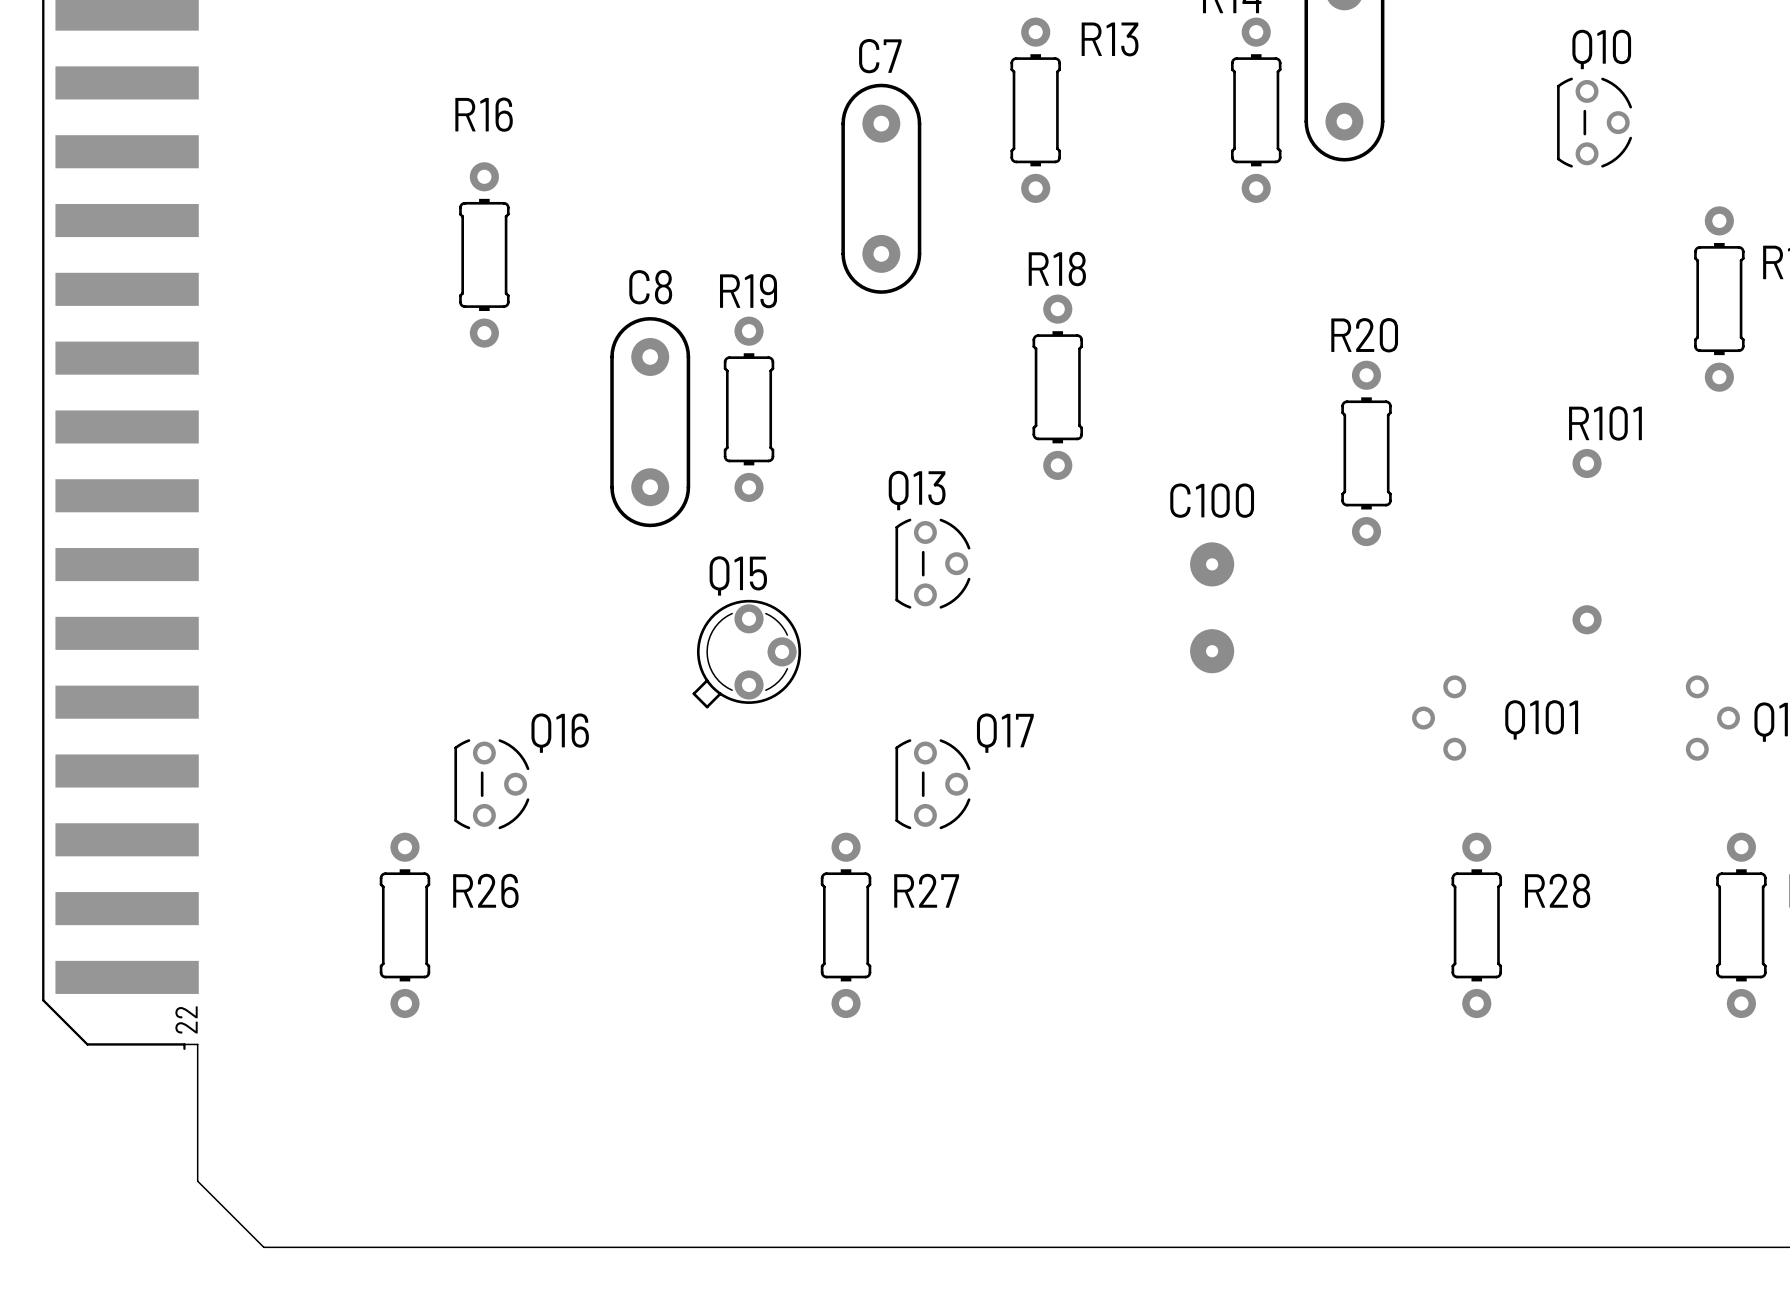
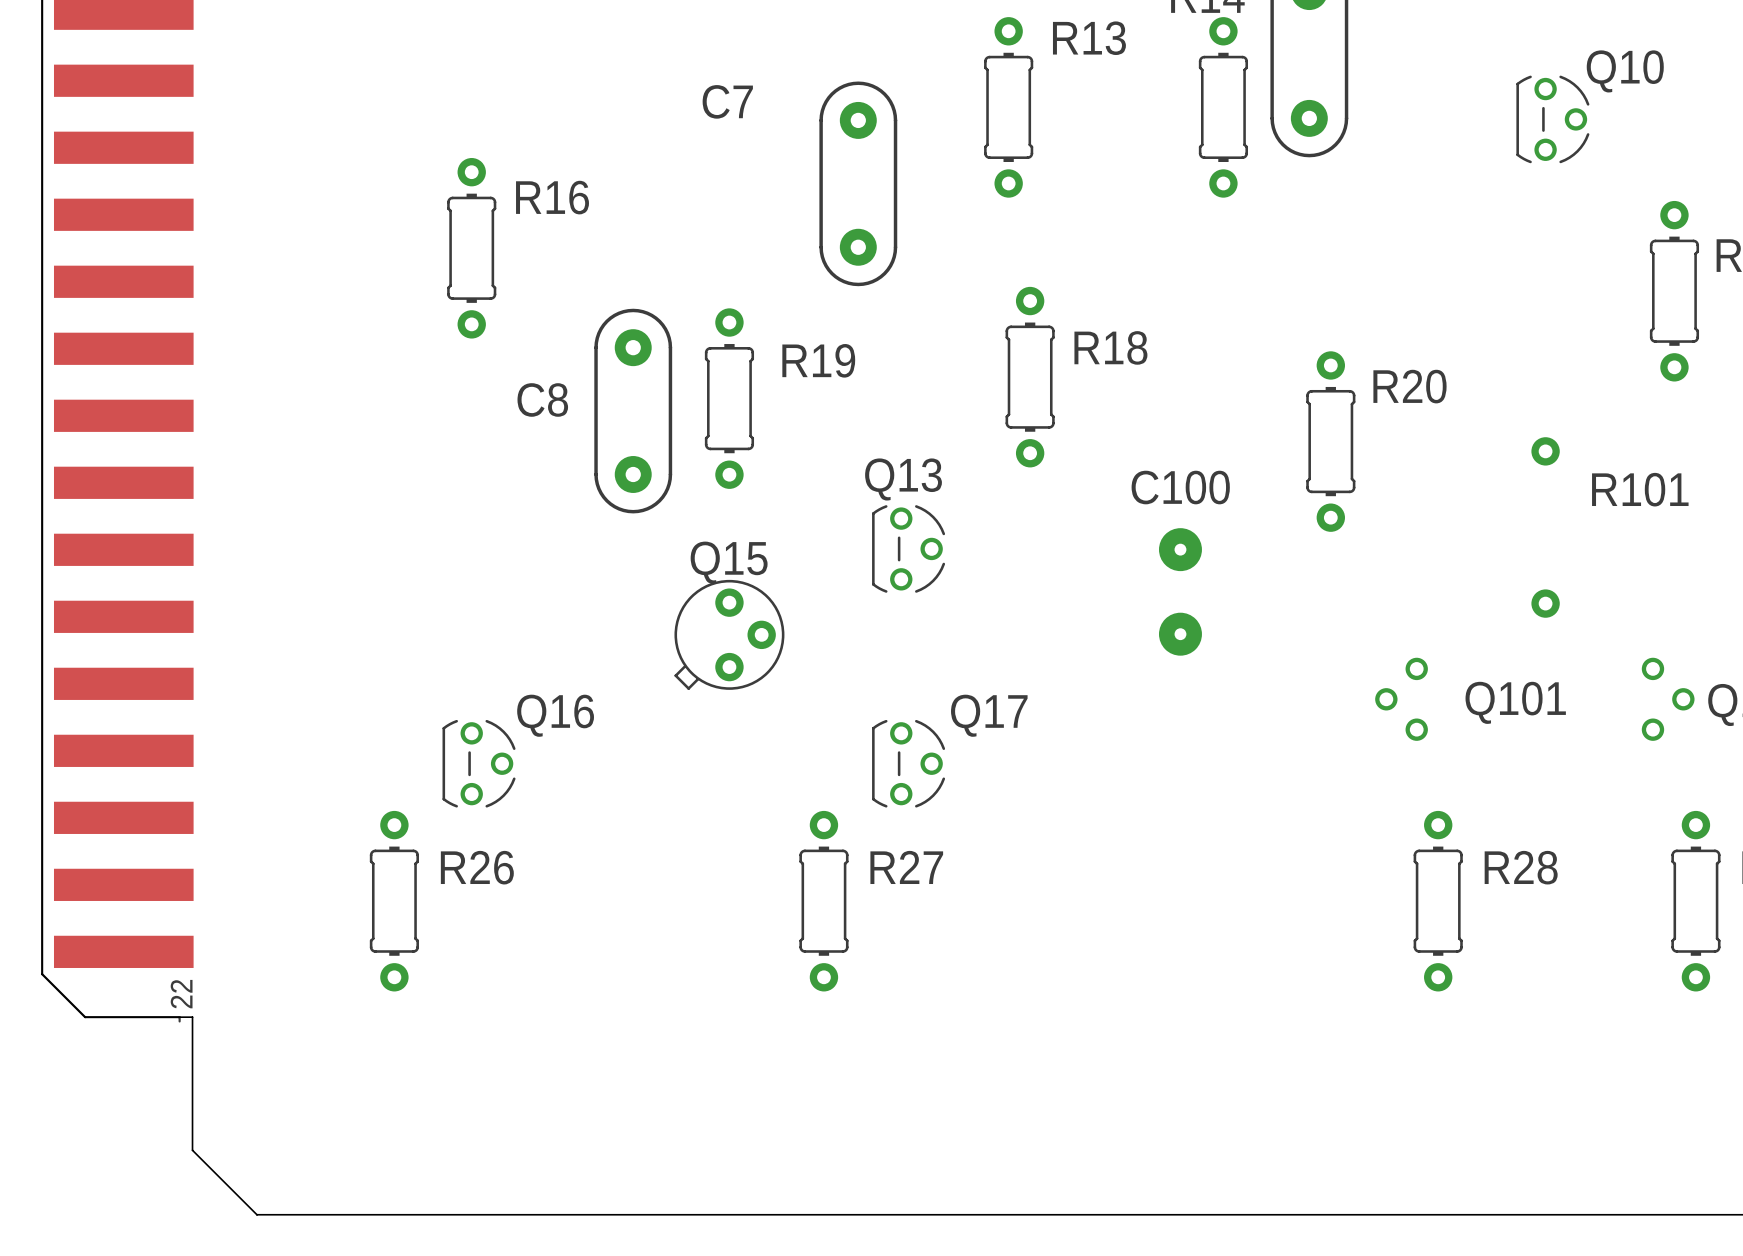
Q10 name position: Q10 (1601, 49) -> Q10 (1625, 71)
C7 name position: C7 (880, 56) -> C7 (727, 101)
R16 name position: R16 (484, 114) -> R16 (552, 197)
R18 name position: R18 (1057, 269) -> R18 (1110, 347)
C8 name position: C8 (650, 287) -> C8 (542, 399)
R19 name position: R19 (748, 291) -> R19 (818, 360)
R20 name position: R20 (1364, 335) -> R20 (1409, 386)
R101 name position: R101 (1605, 423) -> R101 (1640, 489)
Q15 footprint: [692, 599, 802, 709] -> [674, 579, 785, 690]

